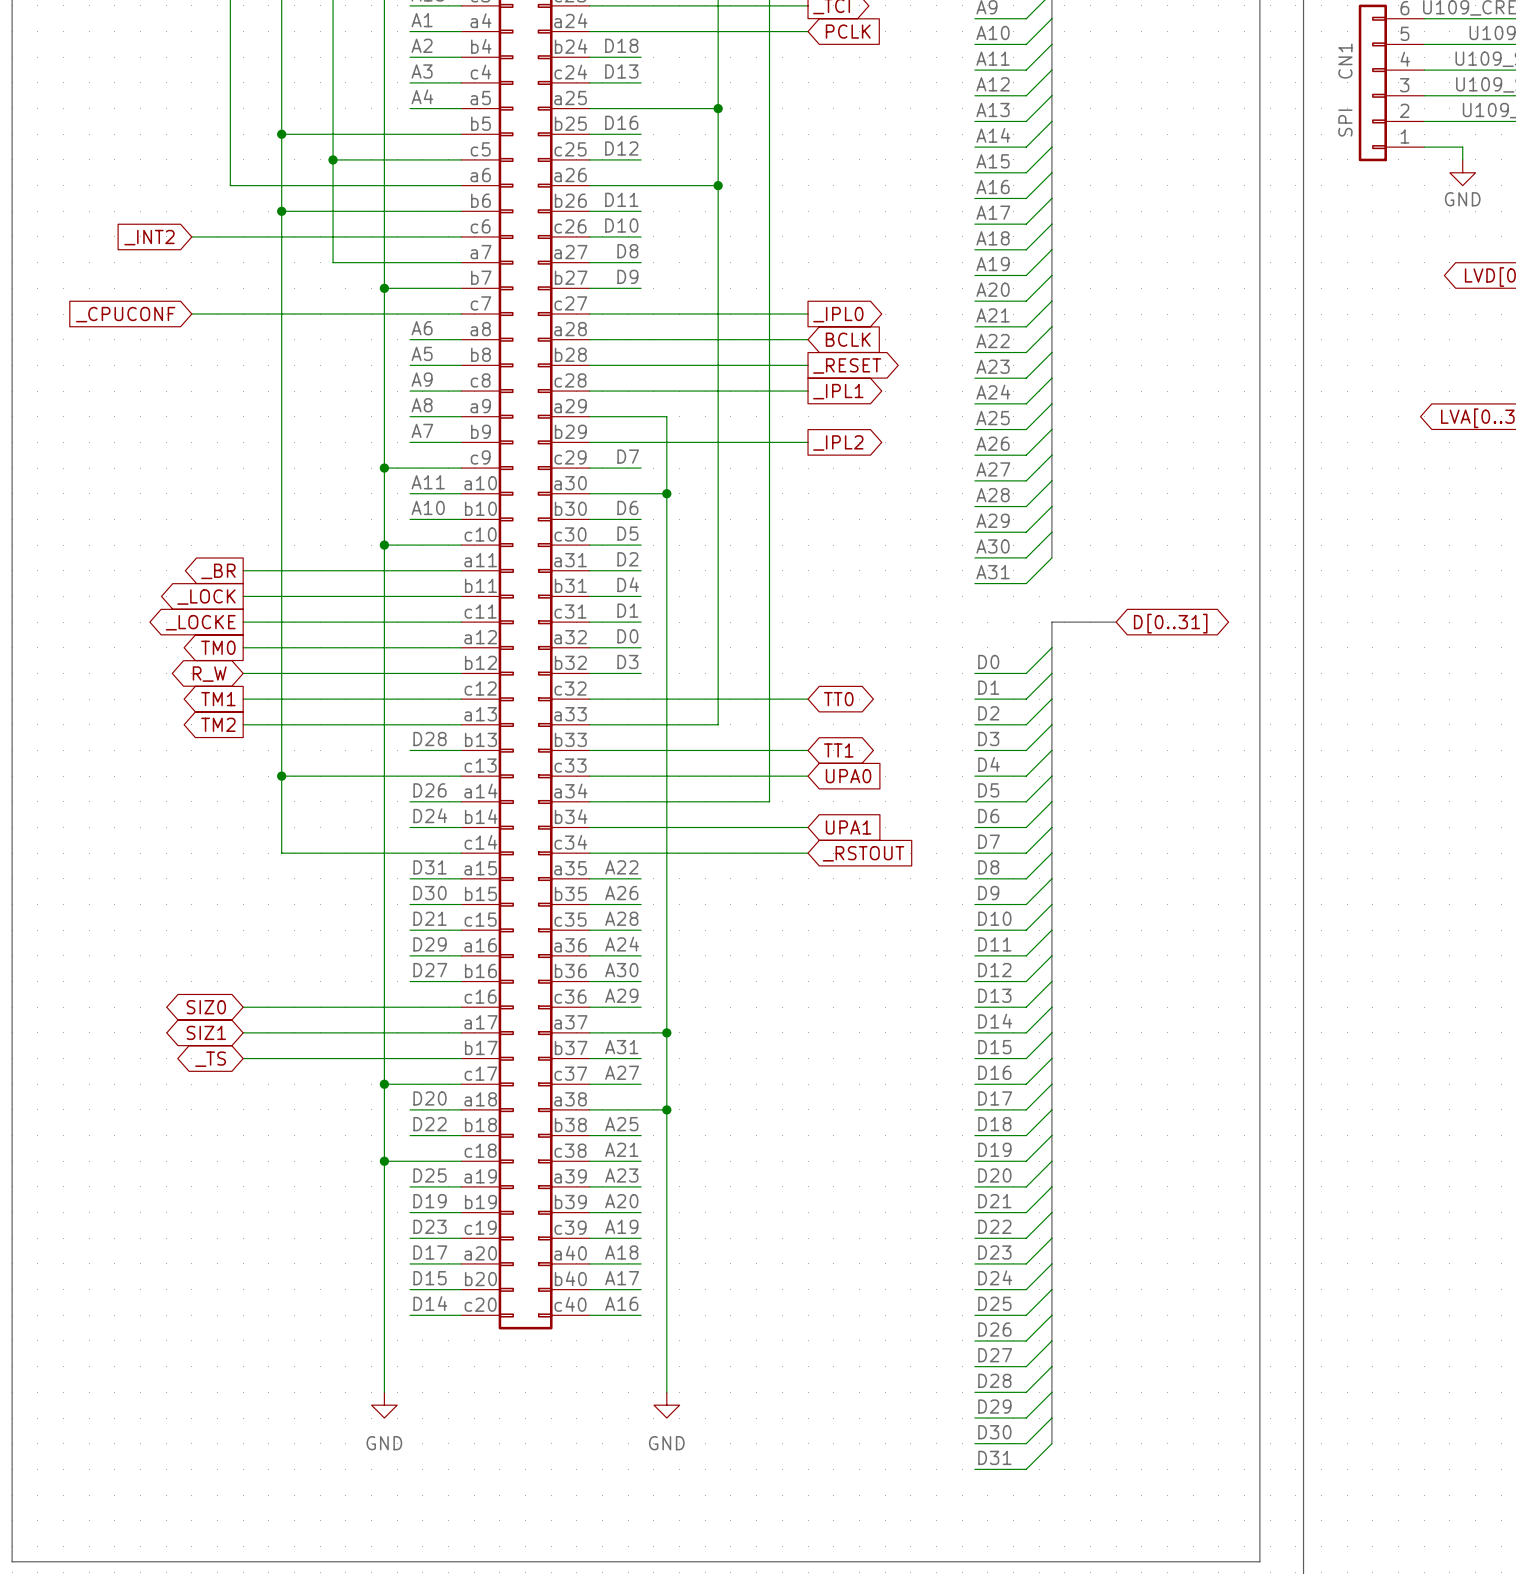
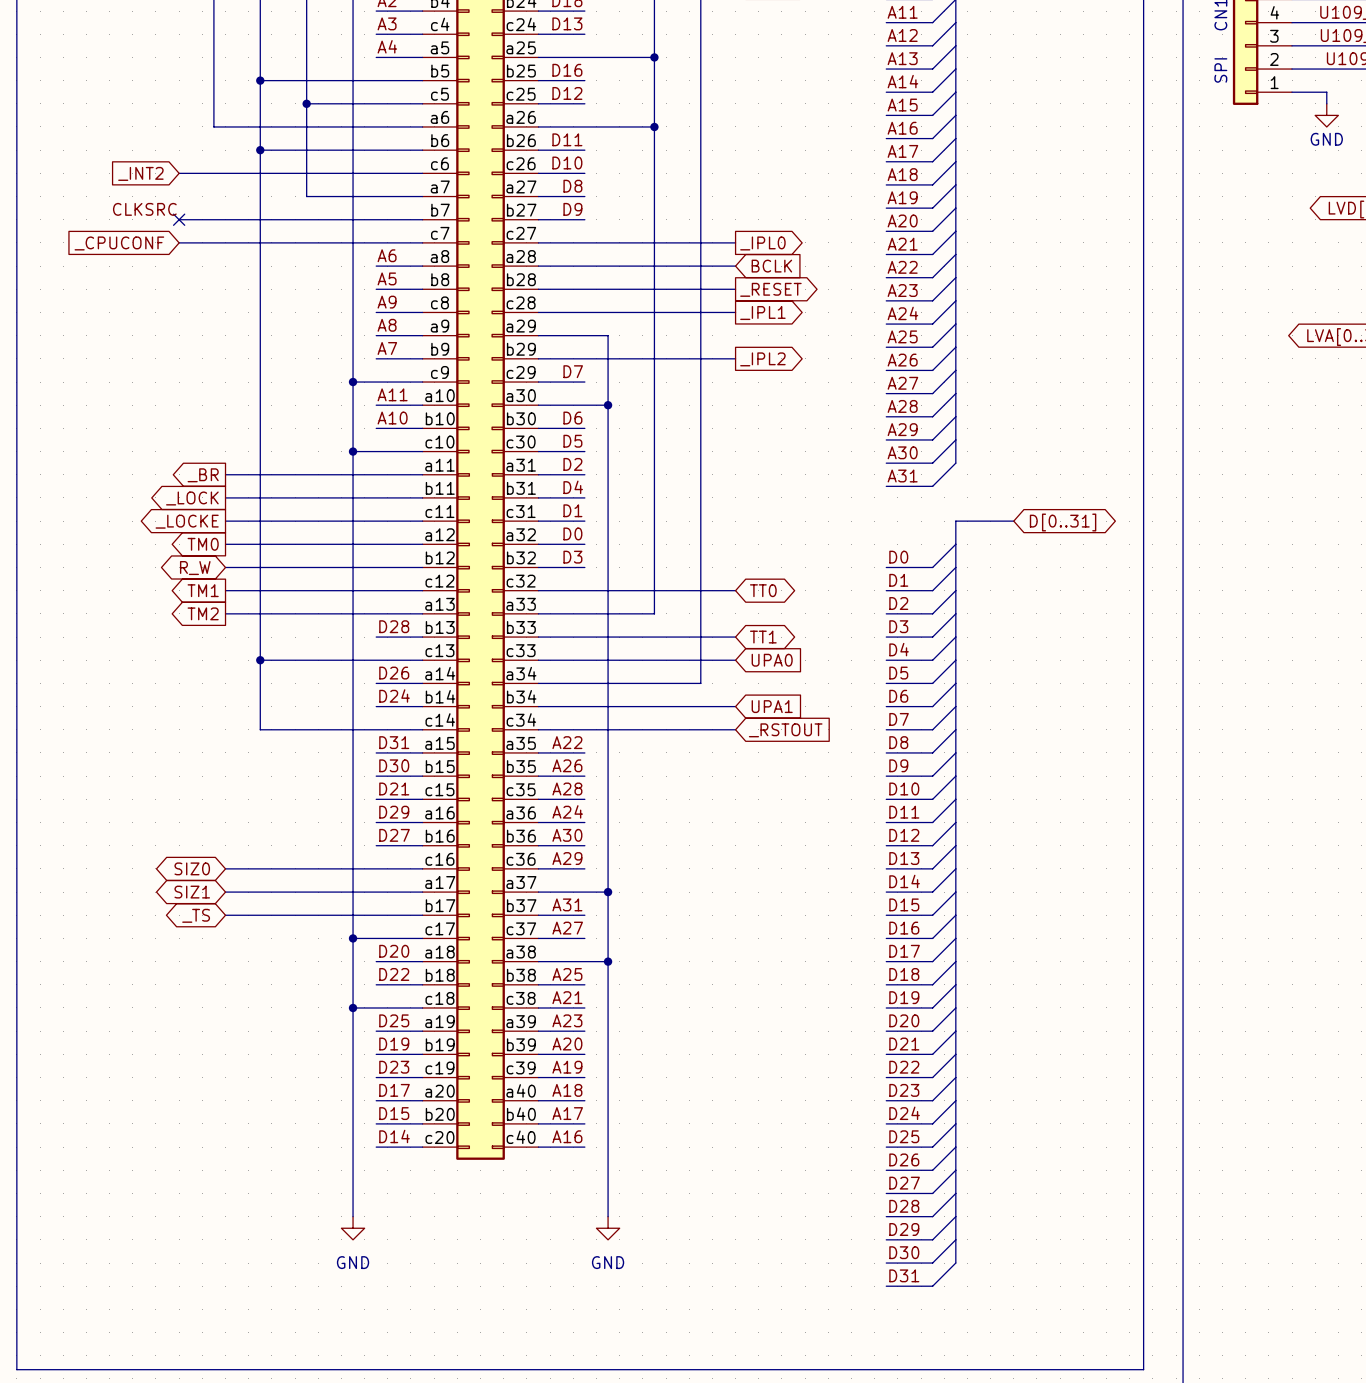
label: none -> CLKSRC (144, 209)
wire: none -> (179, 219) (353, 219)
no-connect mark: none -> (179, 219)
junction: (384, 288) -> none

